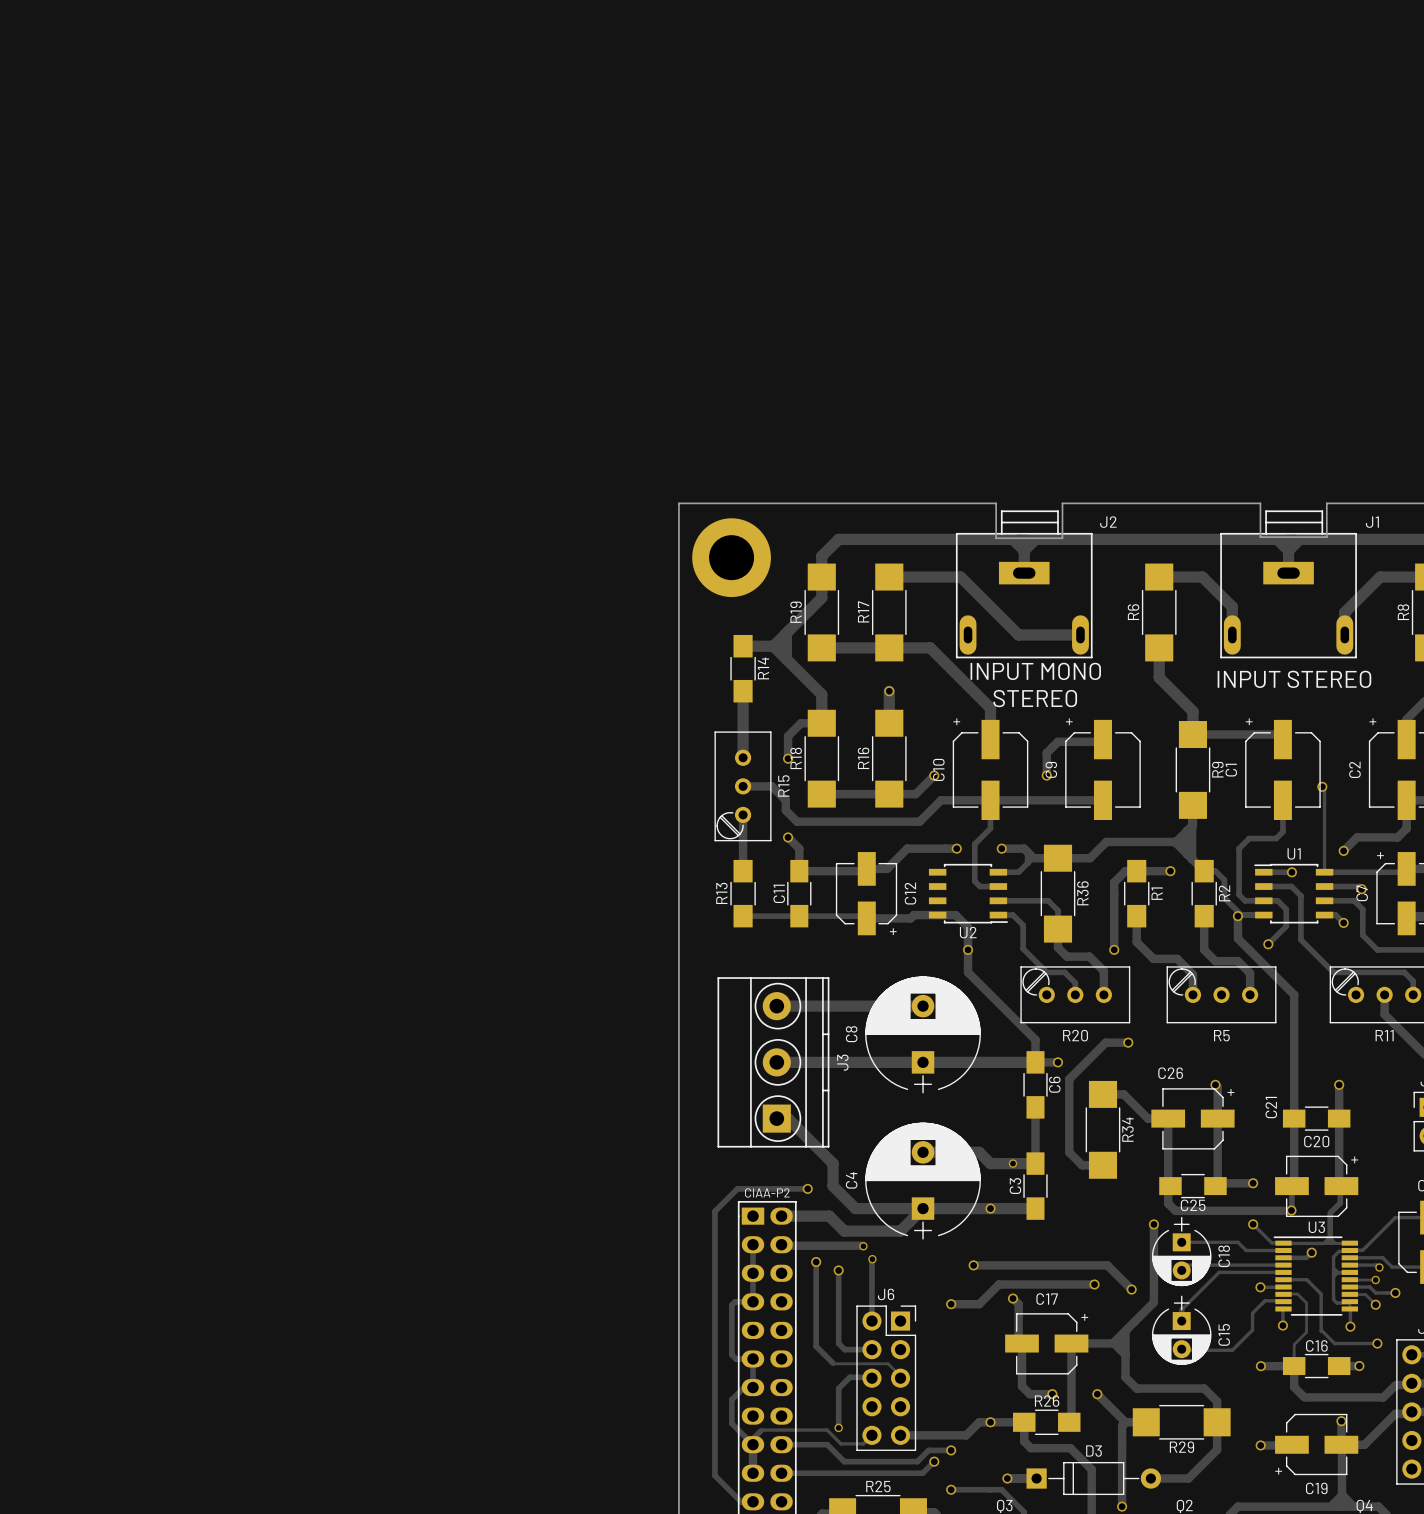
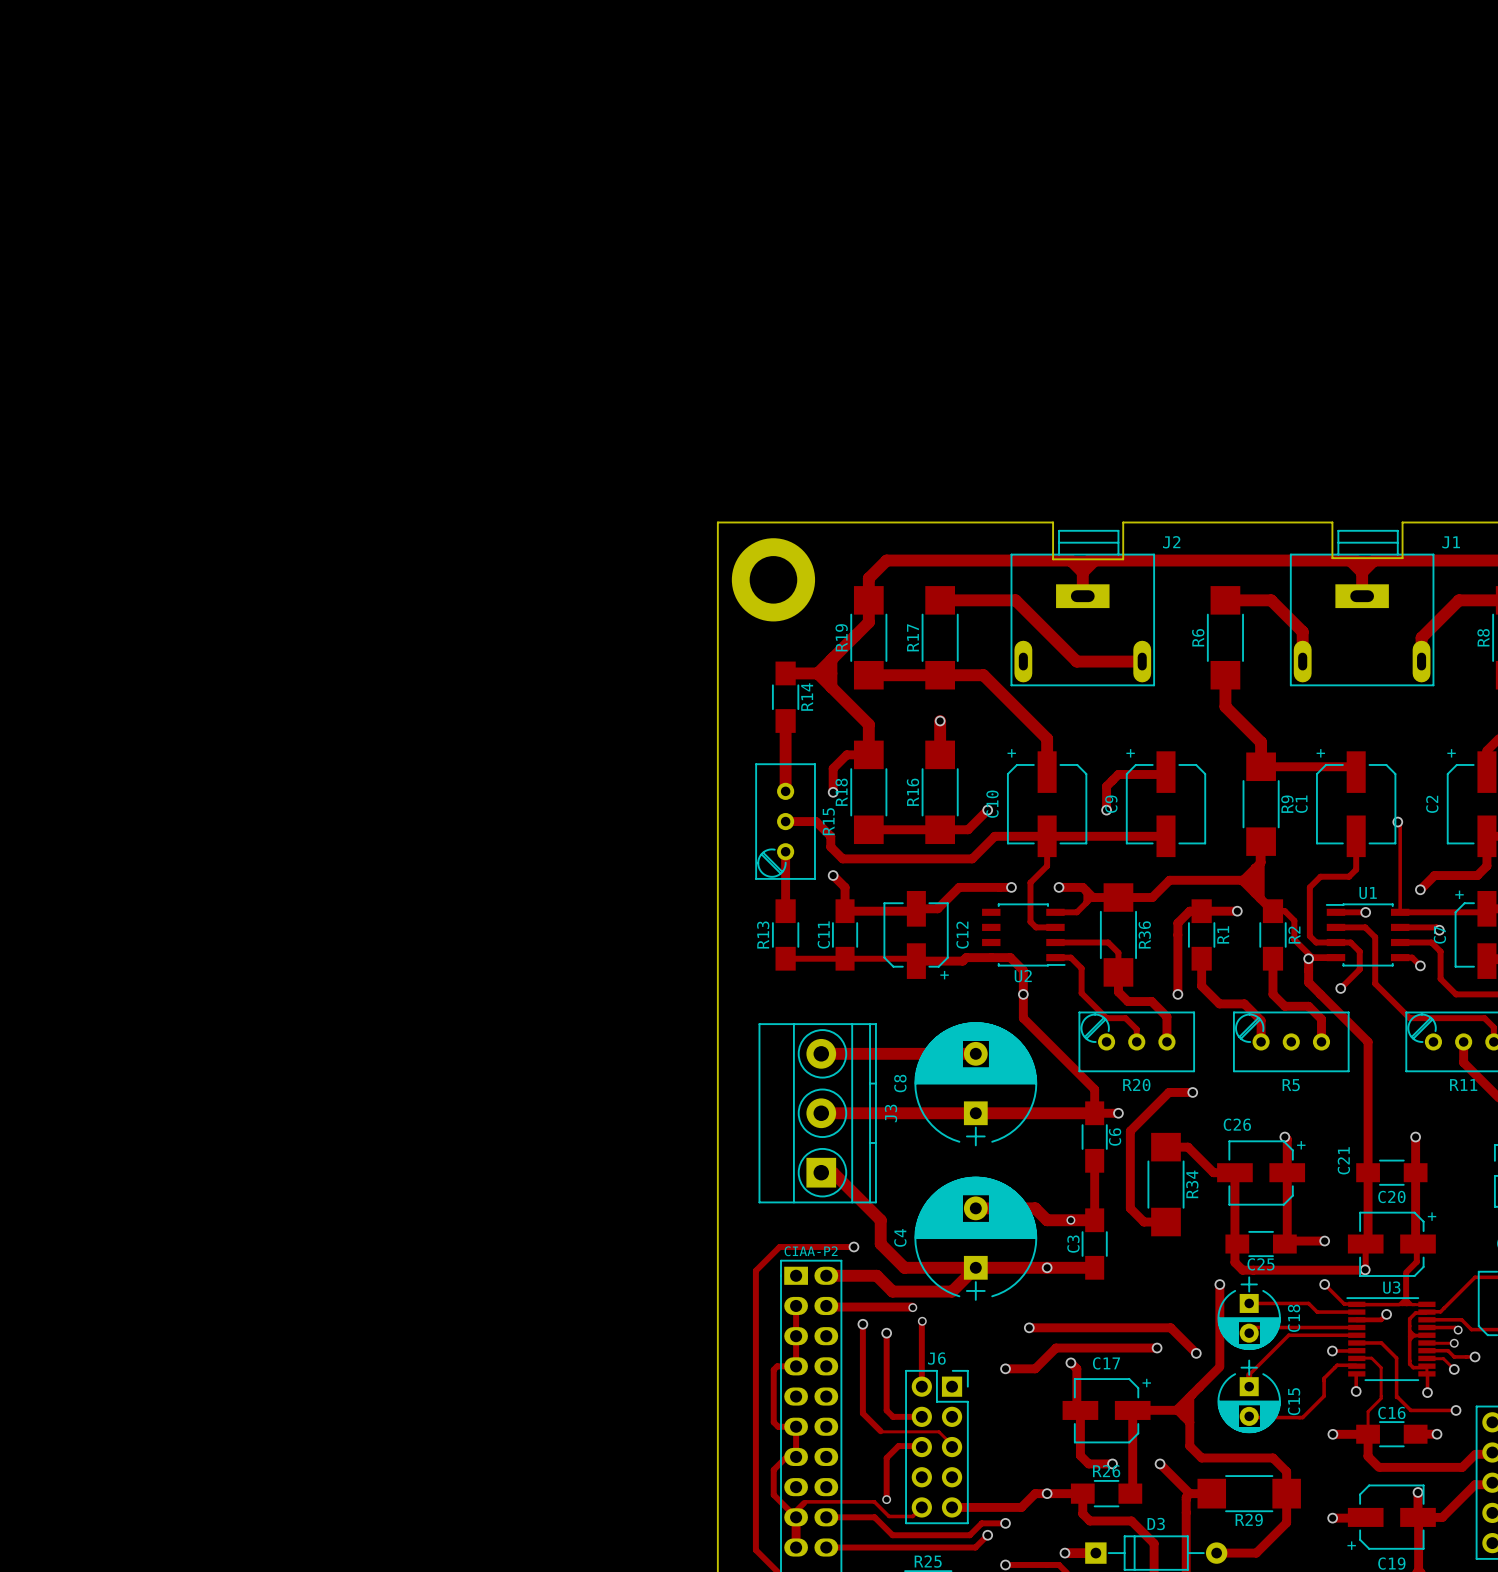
text: INPUT MONO (1035, 671) -> none
text: INPUT STEREO (1294, 679) -> none
text: STEREO (1035, 698) -> none

